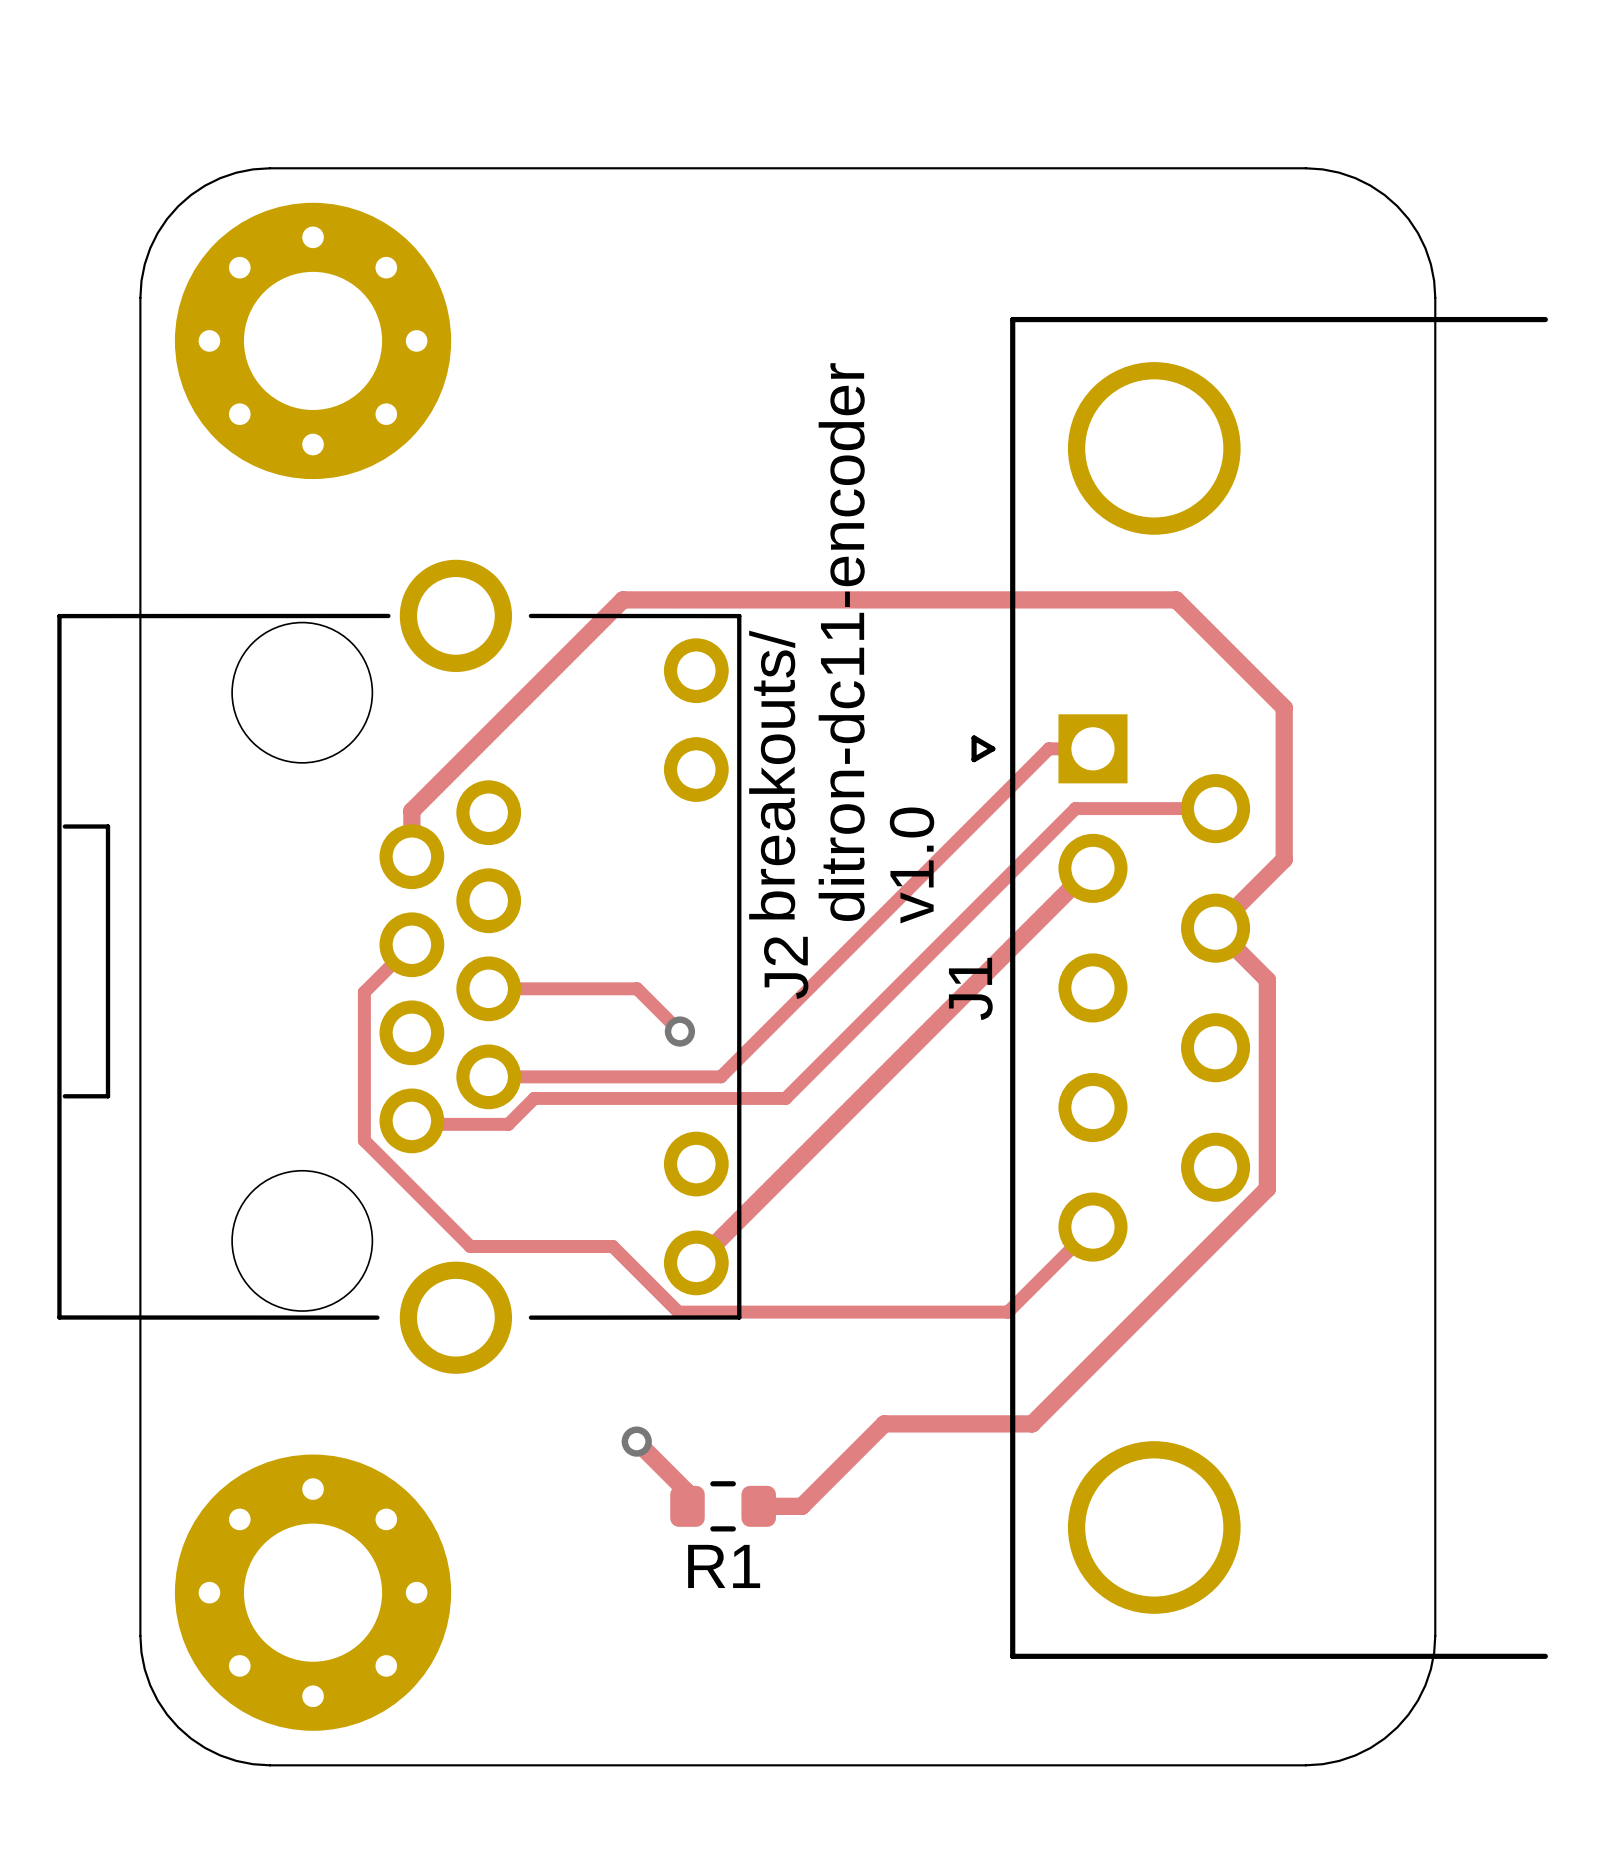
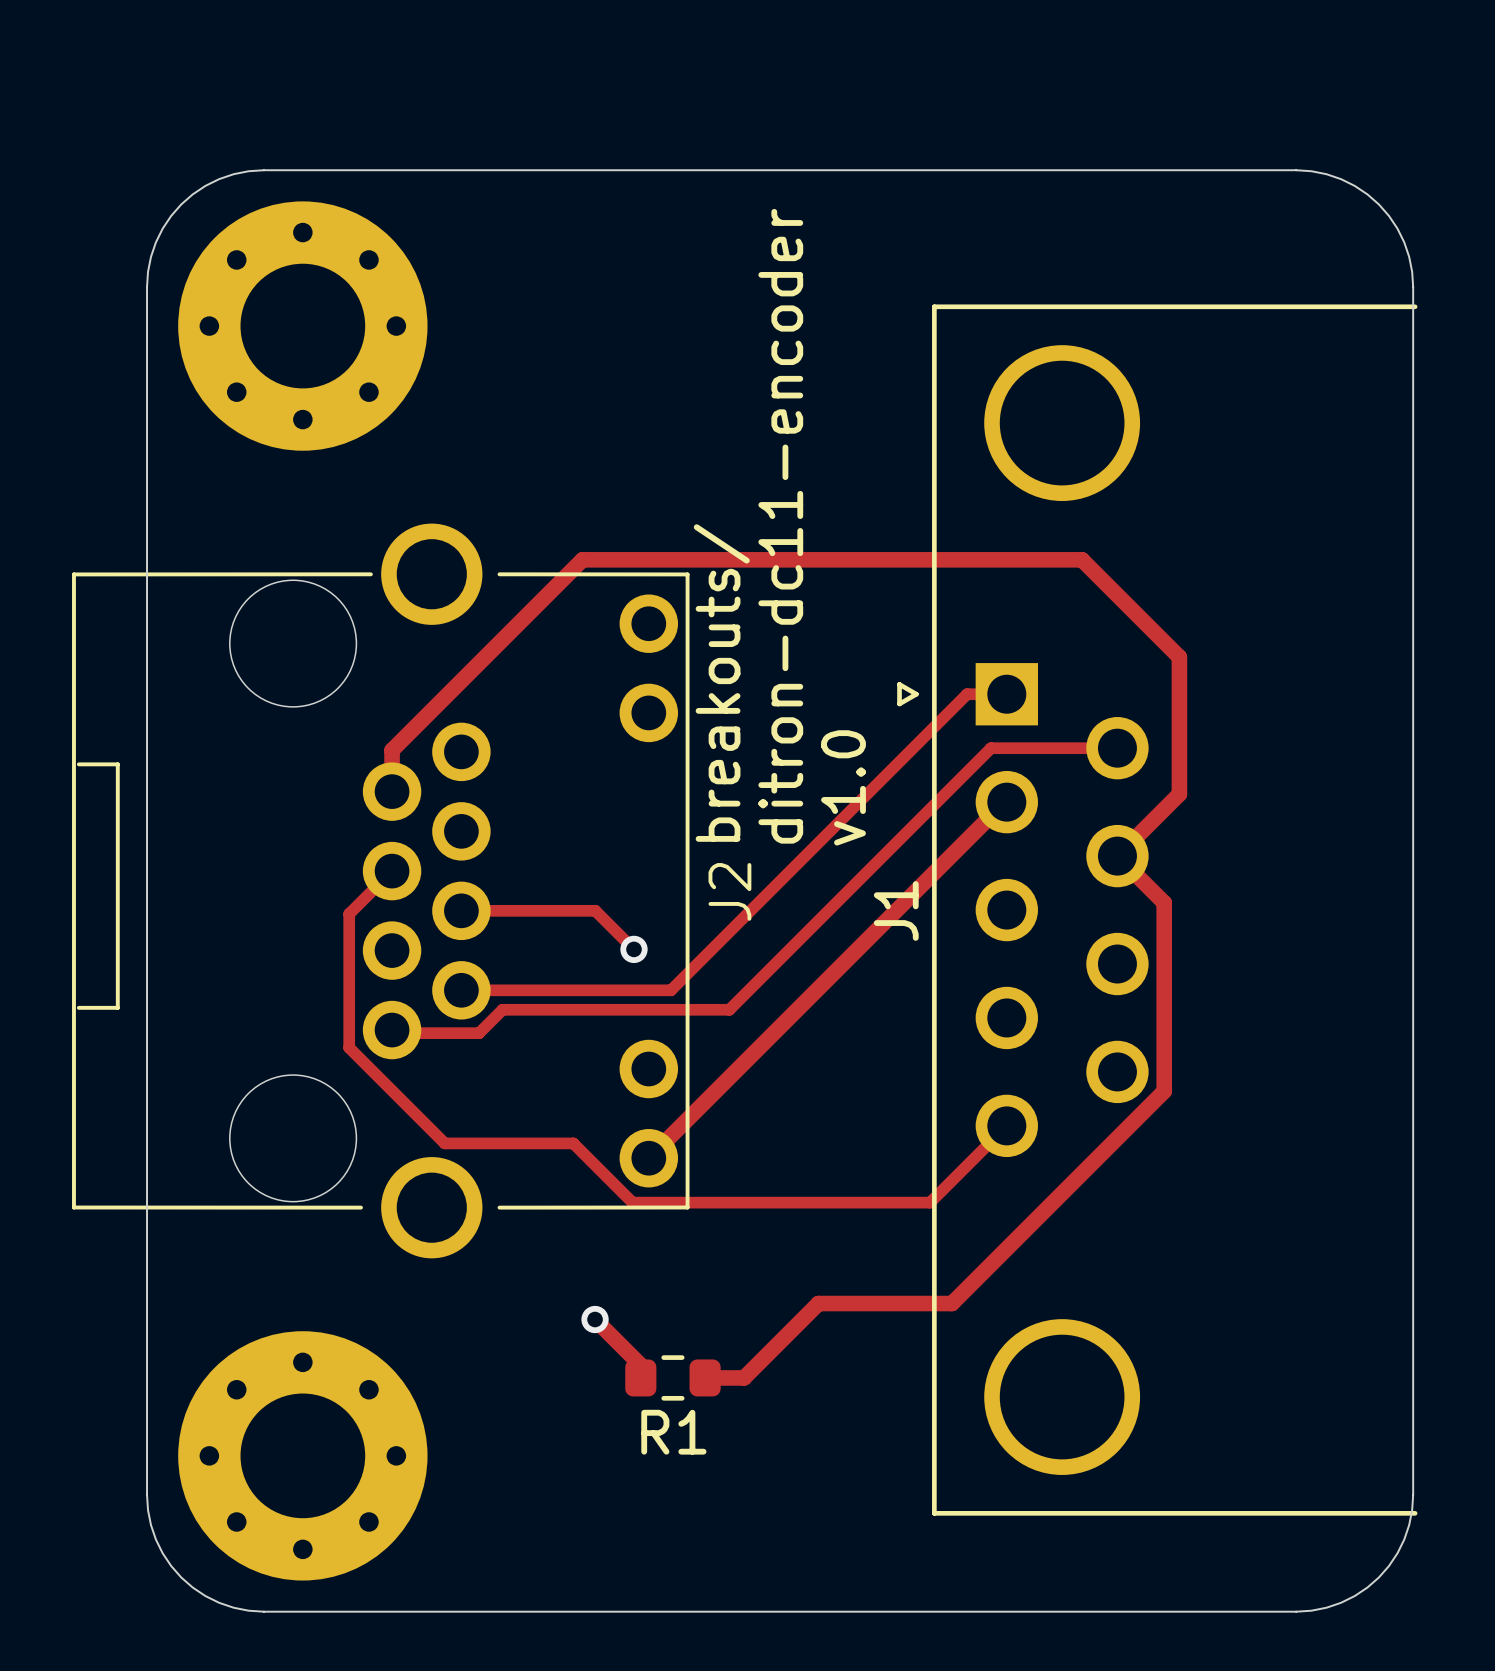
board edge: (1305, 168) (1339, 172) (1355, 178) (1384, 195) (1397, 206) (1417, 233) (1425, 248) (1430, 264) (1435, 297) (1434, 1652) (1425, 1685) (1417, 1700) (1397, 1727) (1384, 1738) (1355, 1755) (1339, 1760) (1305, 1765) -> (1198, 170) (1311, 171) (1326, 174) (1354, 185) (1378, 204) (1397, 228) (1409, 256) (1413, 287) (1412, 1510) (1404, 1539) (1389, 1565) (1367, 1587) (1341, 1602) (1311, 1610) (1296, 1611) (1198, 1611)

